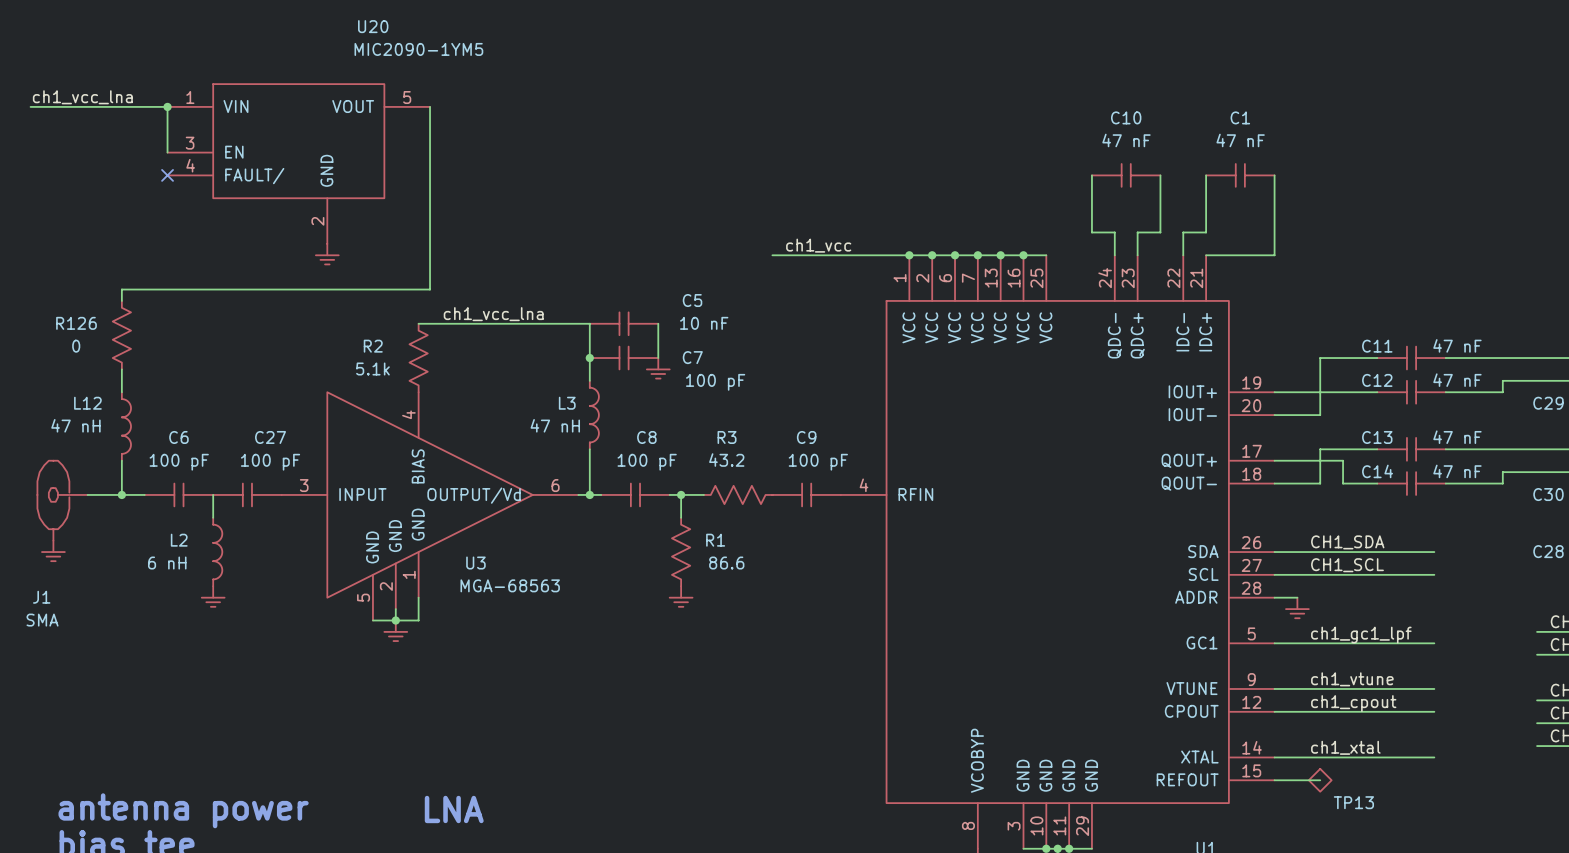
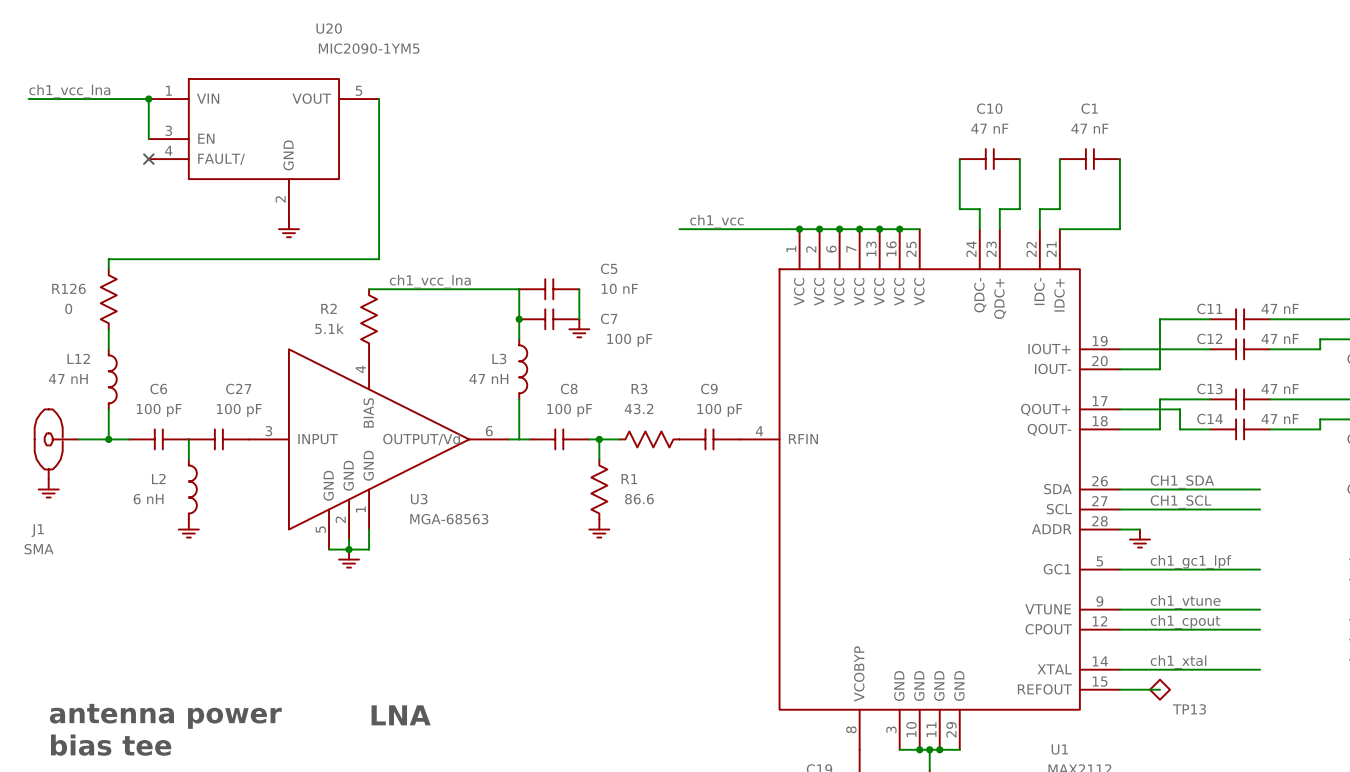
junction: (589, 494) -> none

